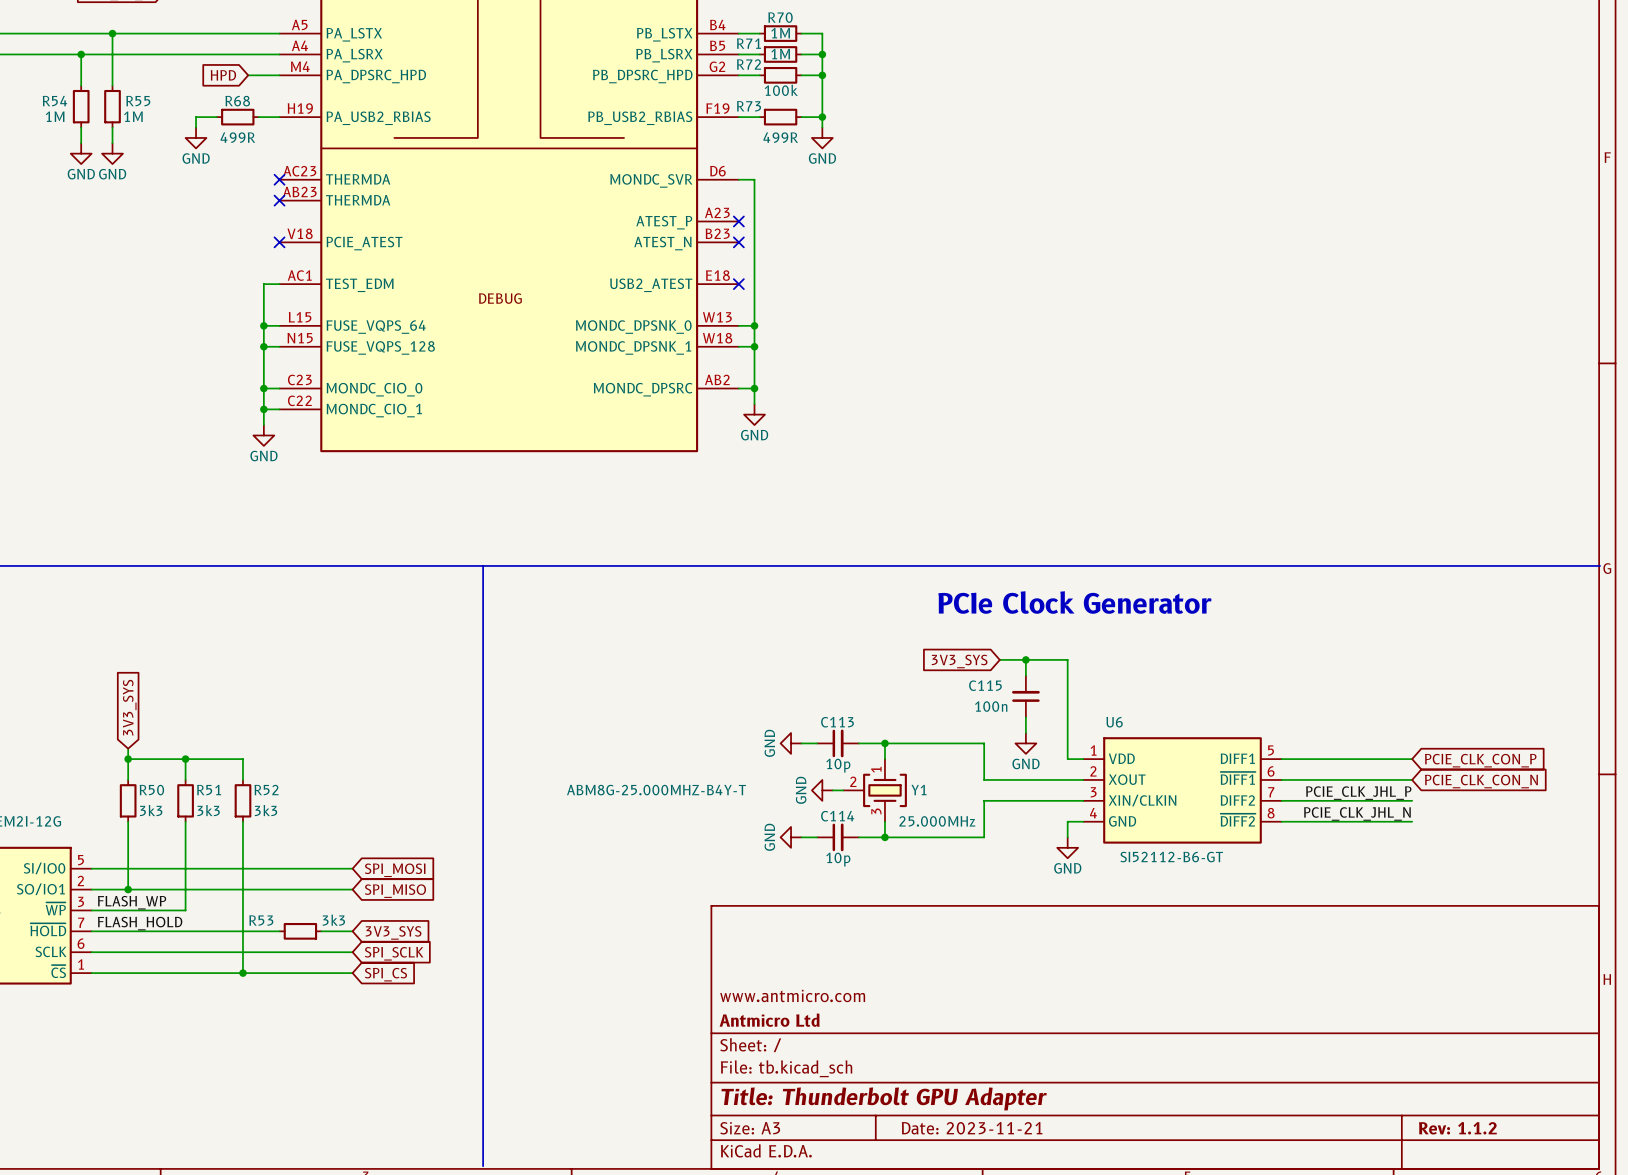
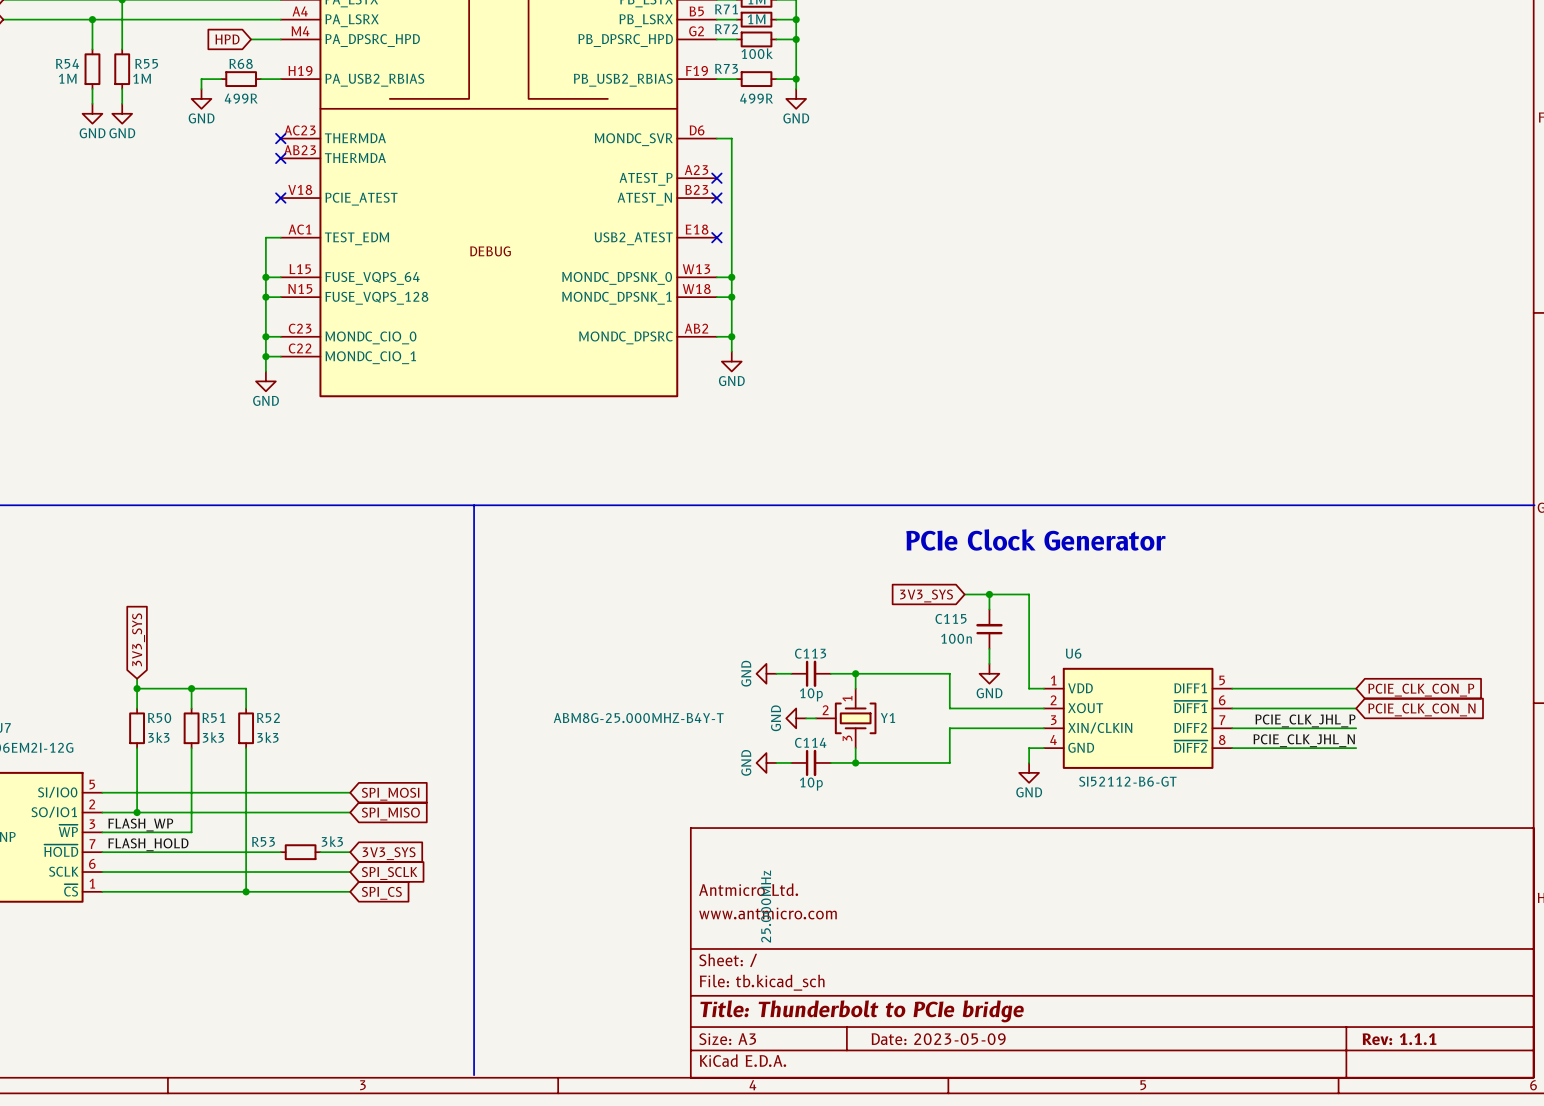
Y1 text rotation: 0° (937, 821) -> 90° counterclockwise (766, 906)
Y1 text position: 25.000MHz (937, 821) -> 25.000MHz (766, 906)
title block: none -> Antmicro Ltd. (748, 889)
title block: Antmicro Ltd (769, 1020) -> none
title block: Title: Thunderbolt GPU Adapter (884, 1098) -> Title: Thunderbolt to PCIe bridge (862, 1011)
title block: Date: 2023-11-21 (972, 1128) -> Date: 2023-05-09 (938, 1039)
title block: Rev: 1.1.2 (1457, 1128) -> Rev: 1.1.1 (1399, 1039)

